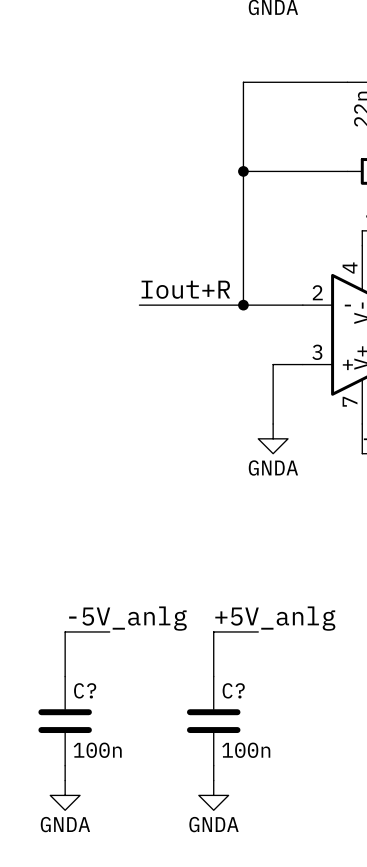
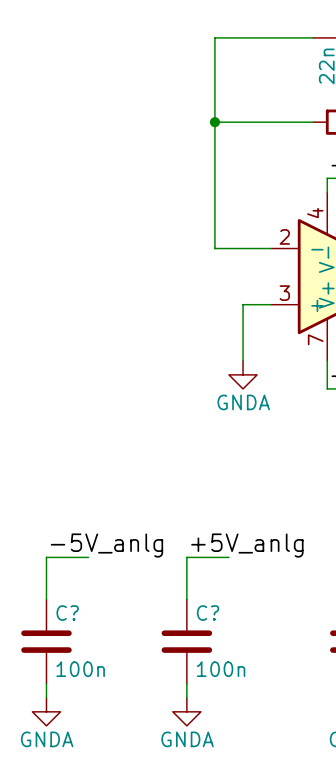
label: Iout+R (185, 289) -> none
wire: (139, 305) (243, 305) -> none
junction: (243, 305) -> none

